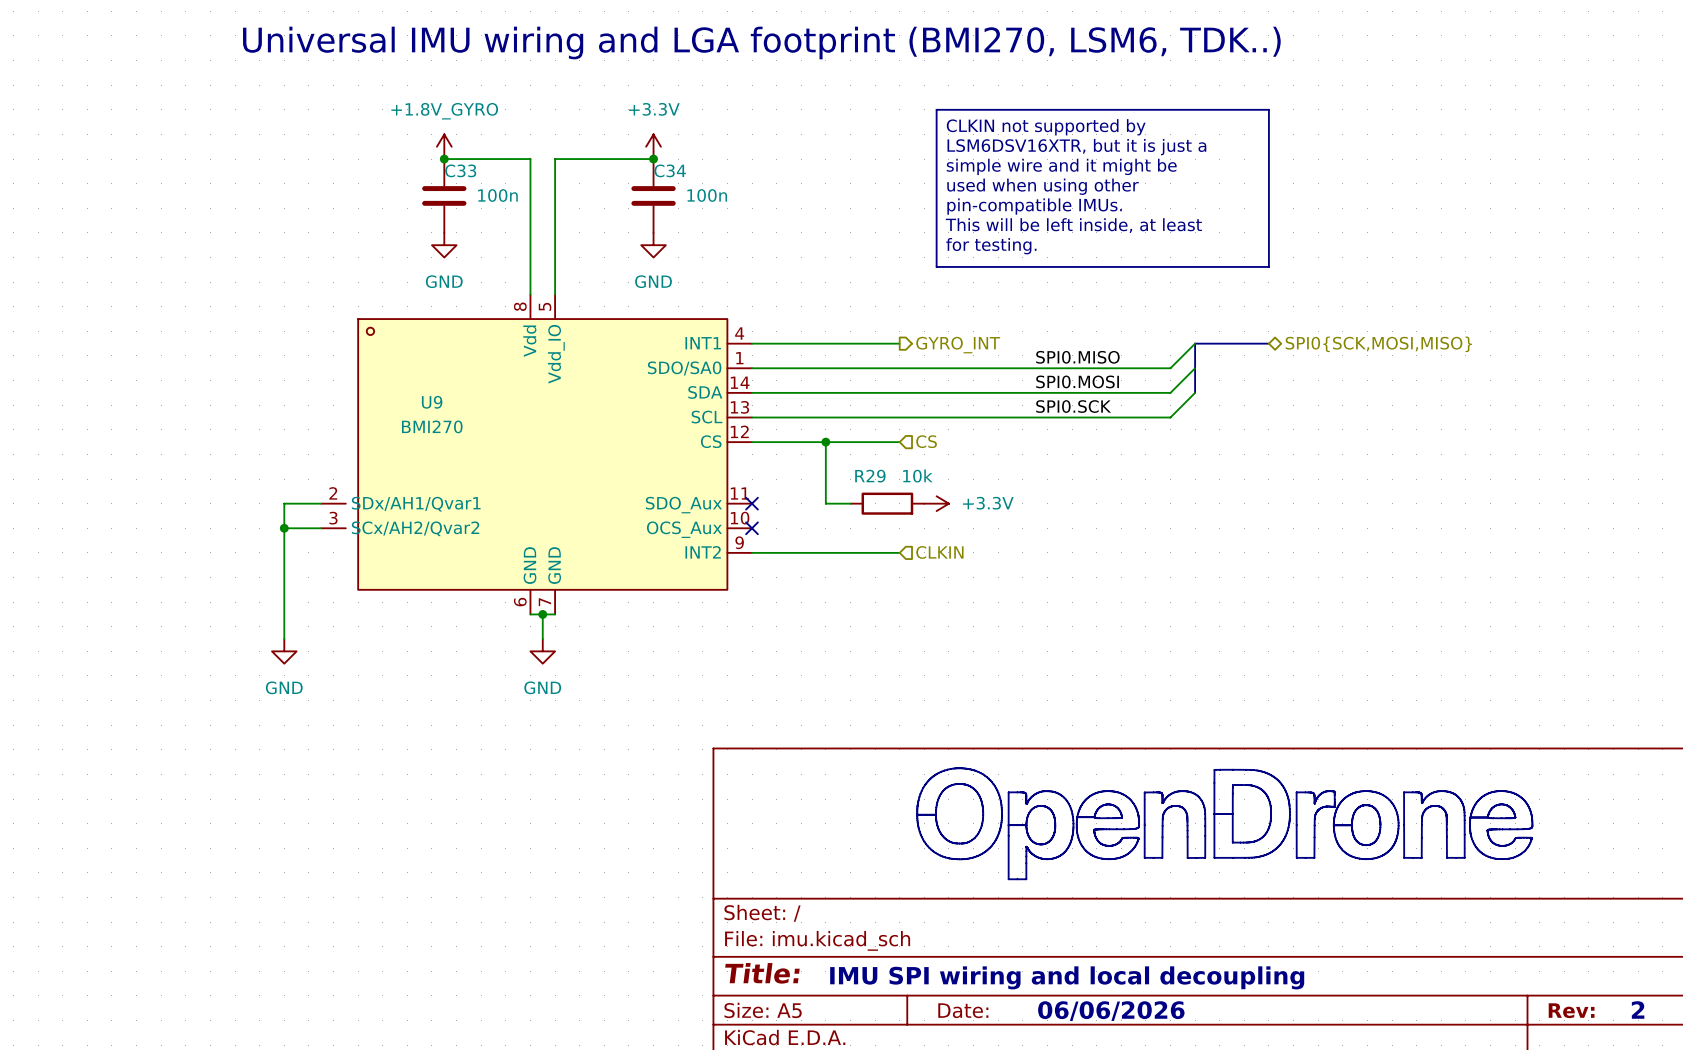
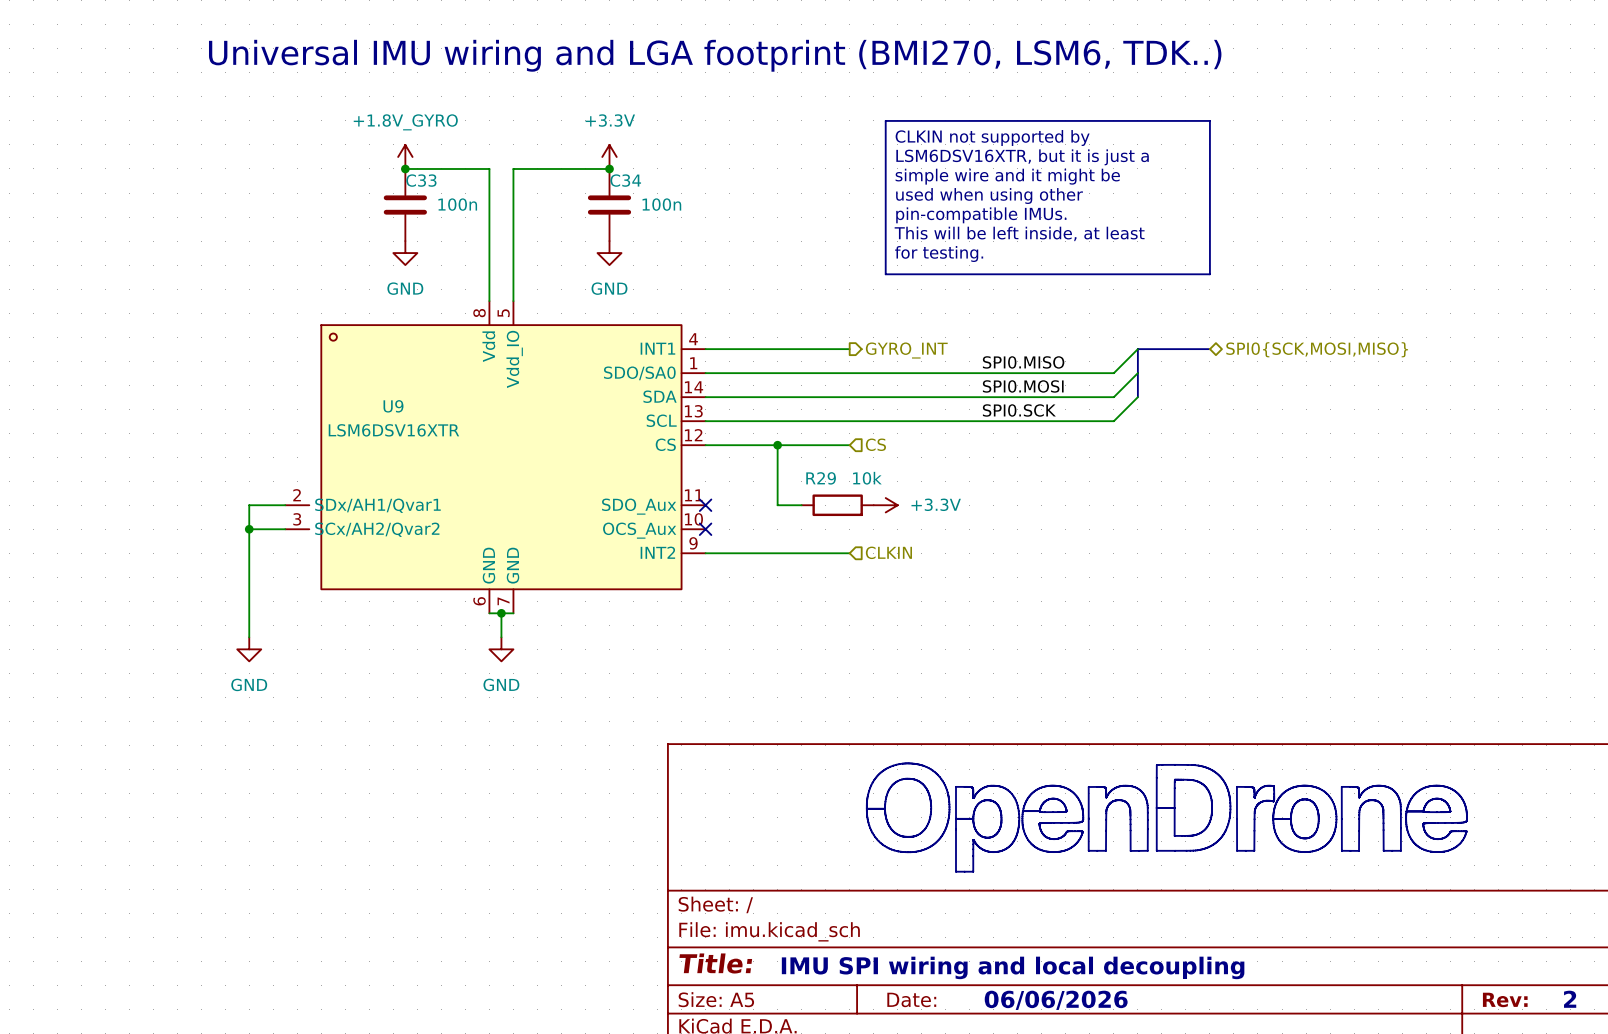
U9 value: BMI270 (432, 426) -> LSM6DSV16XTR (393, 430)

